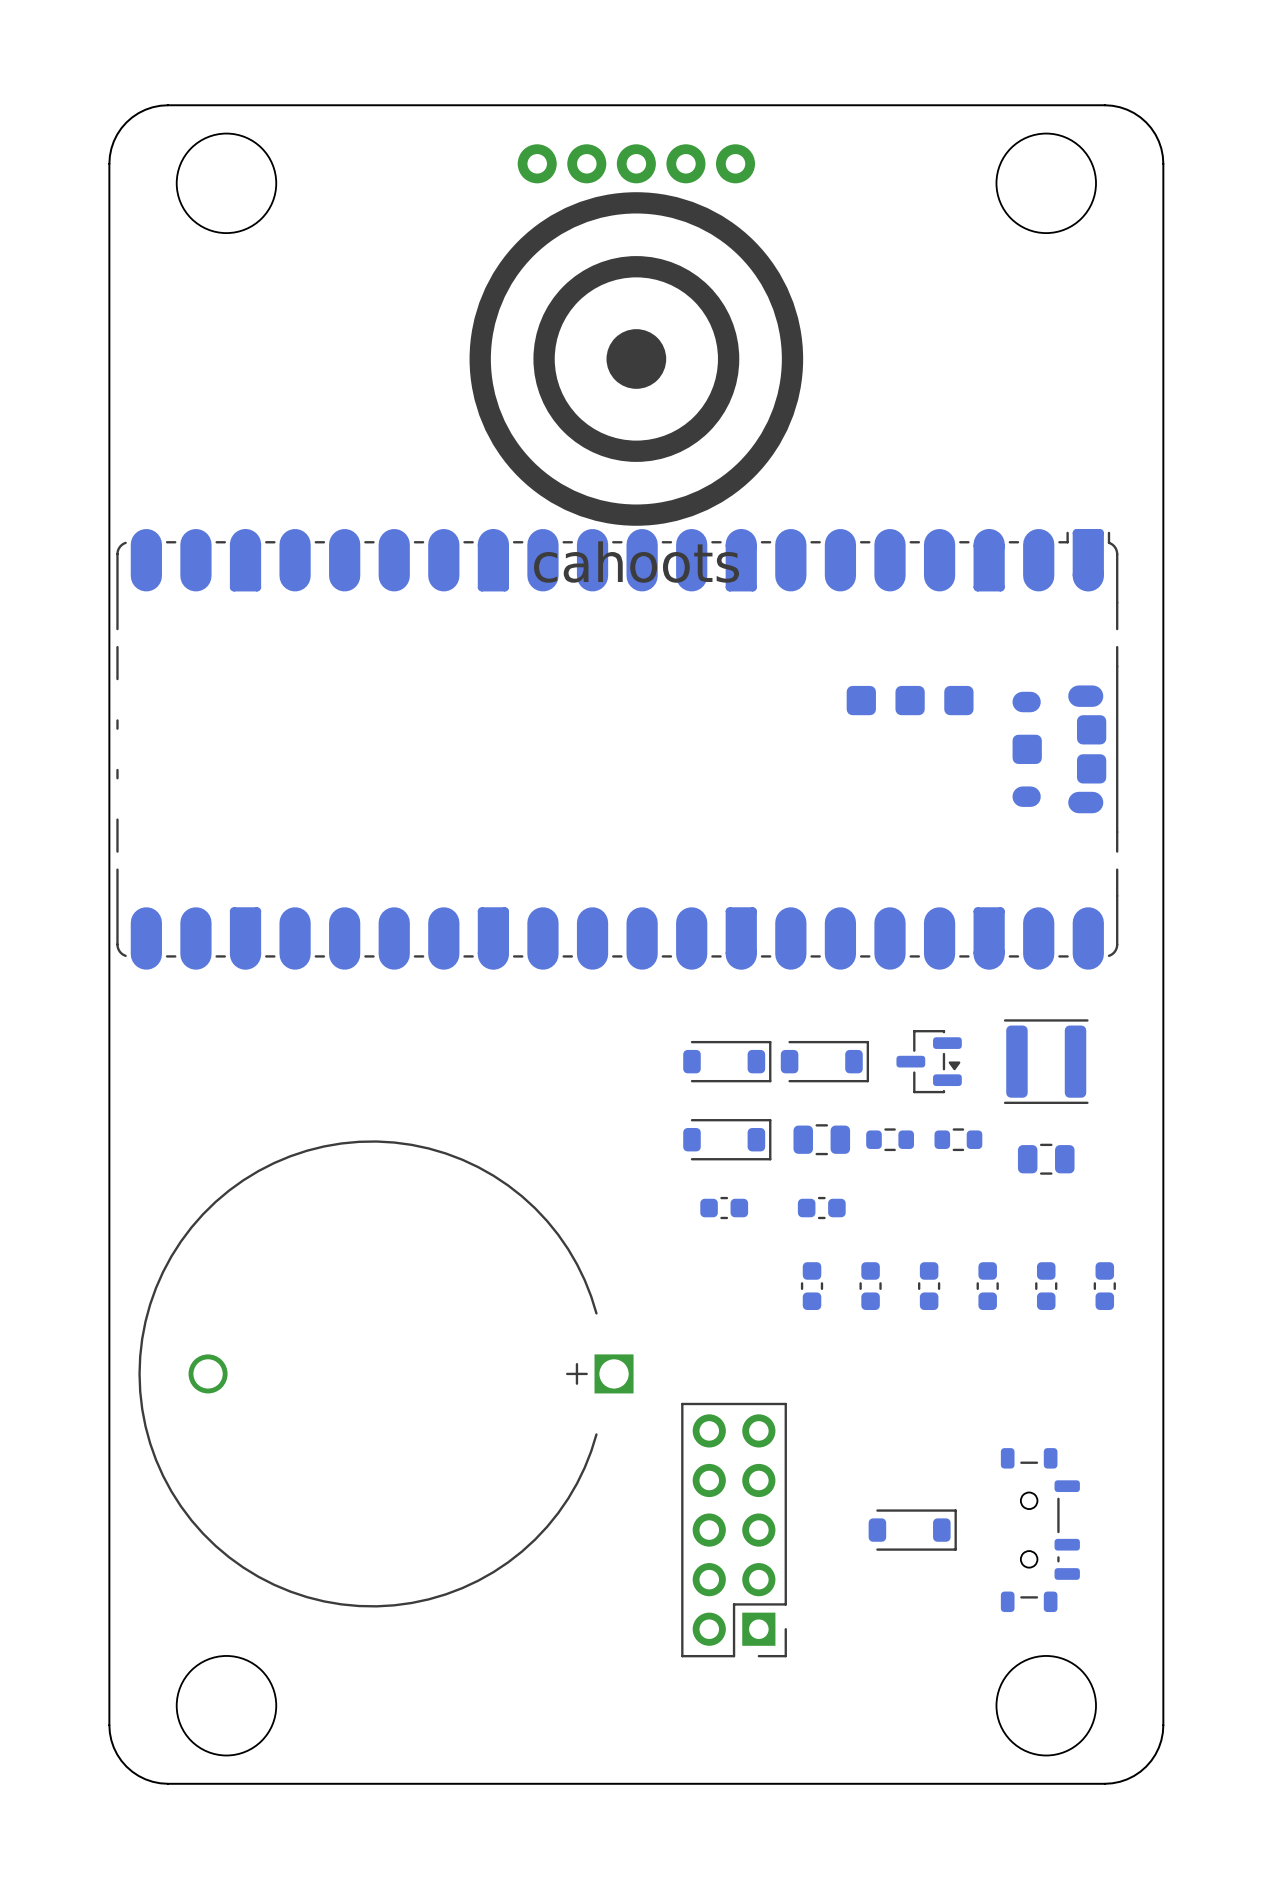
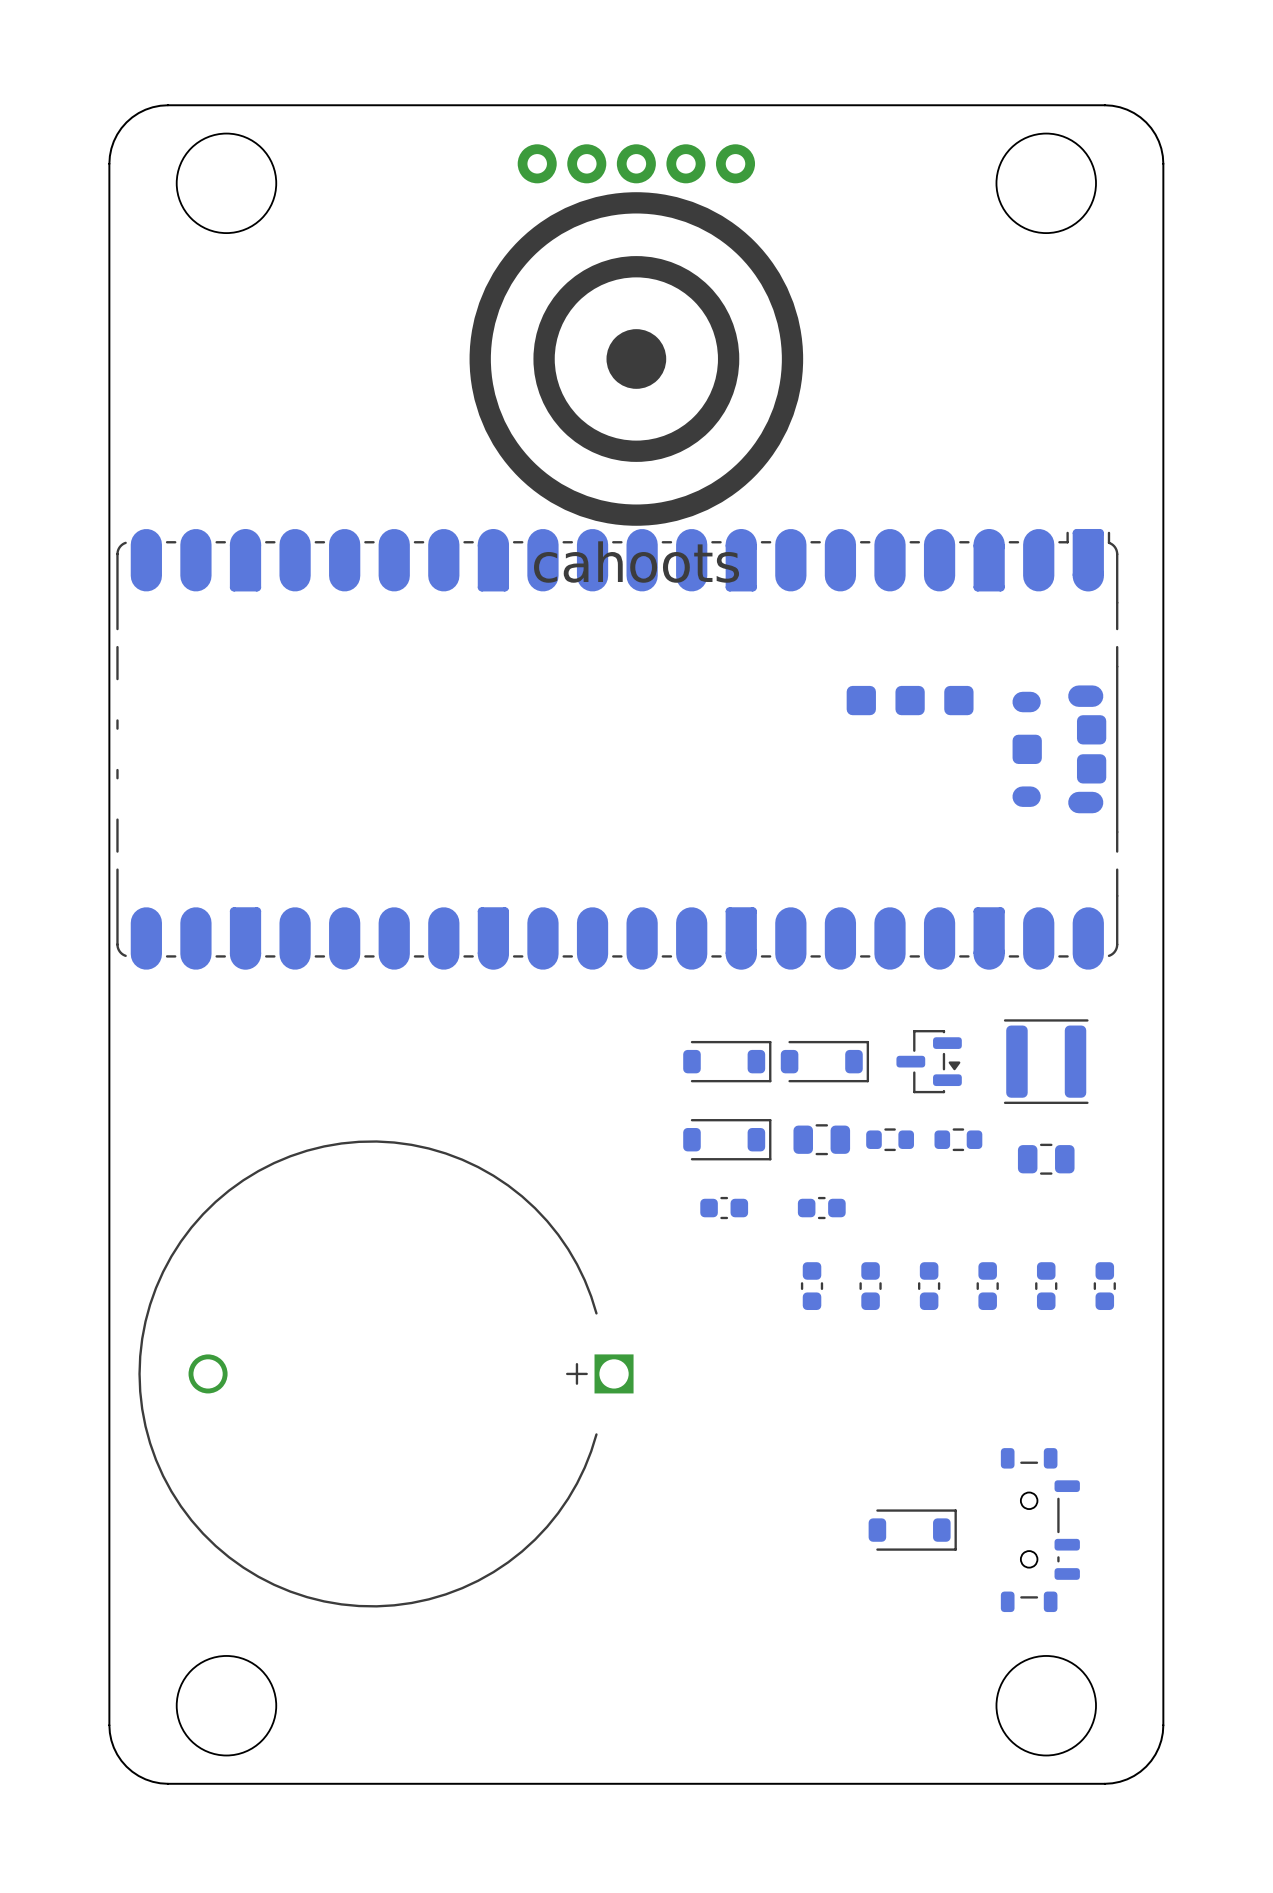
part: (734, 1530) -> none

